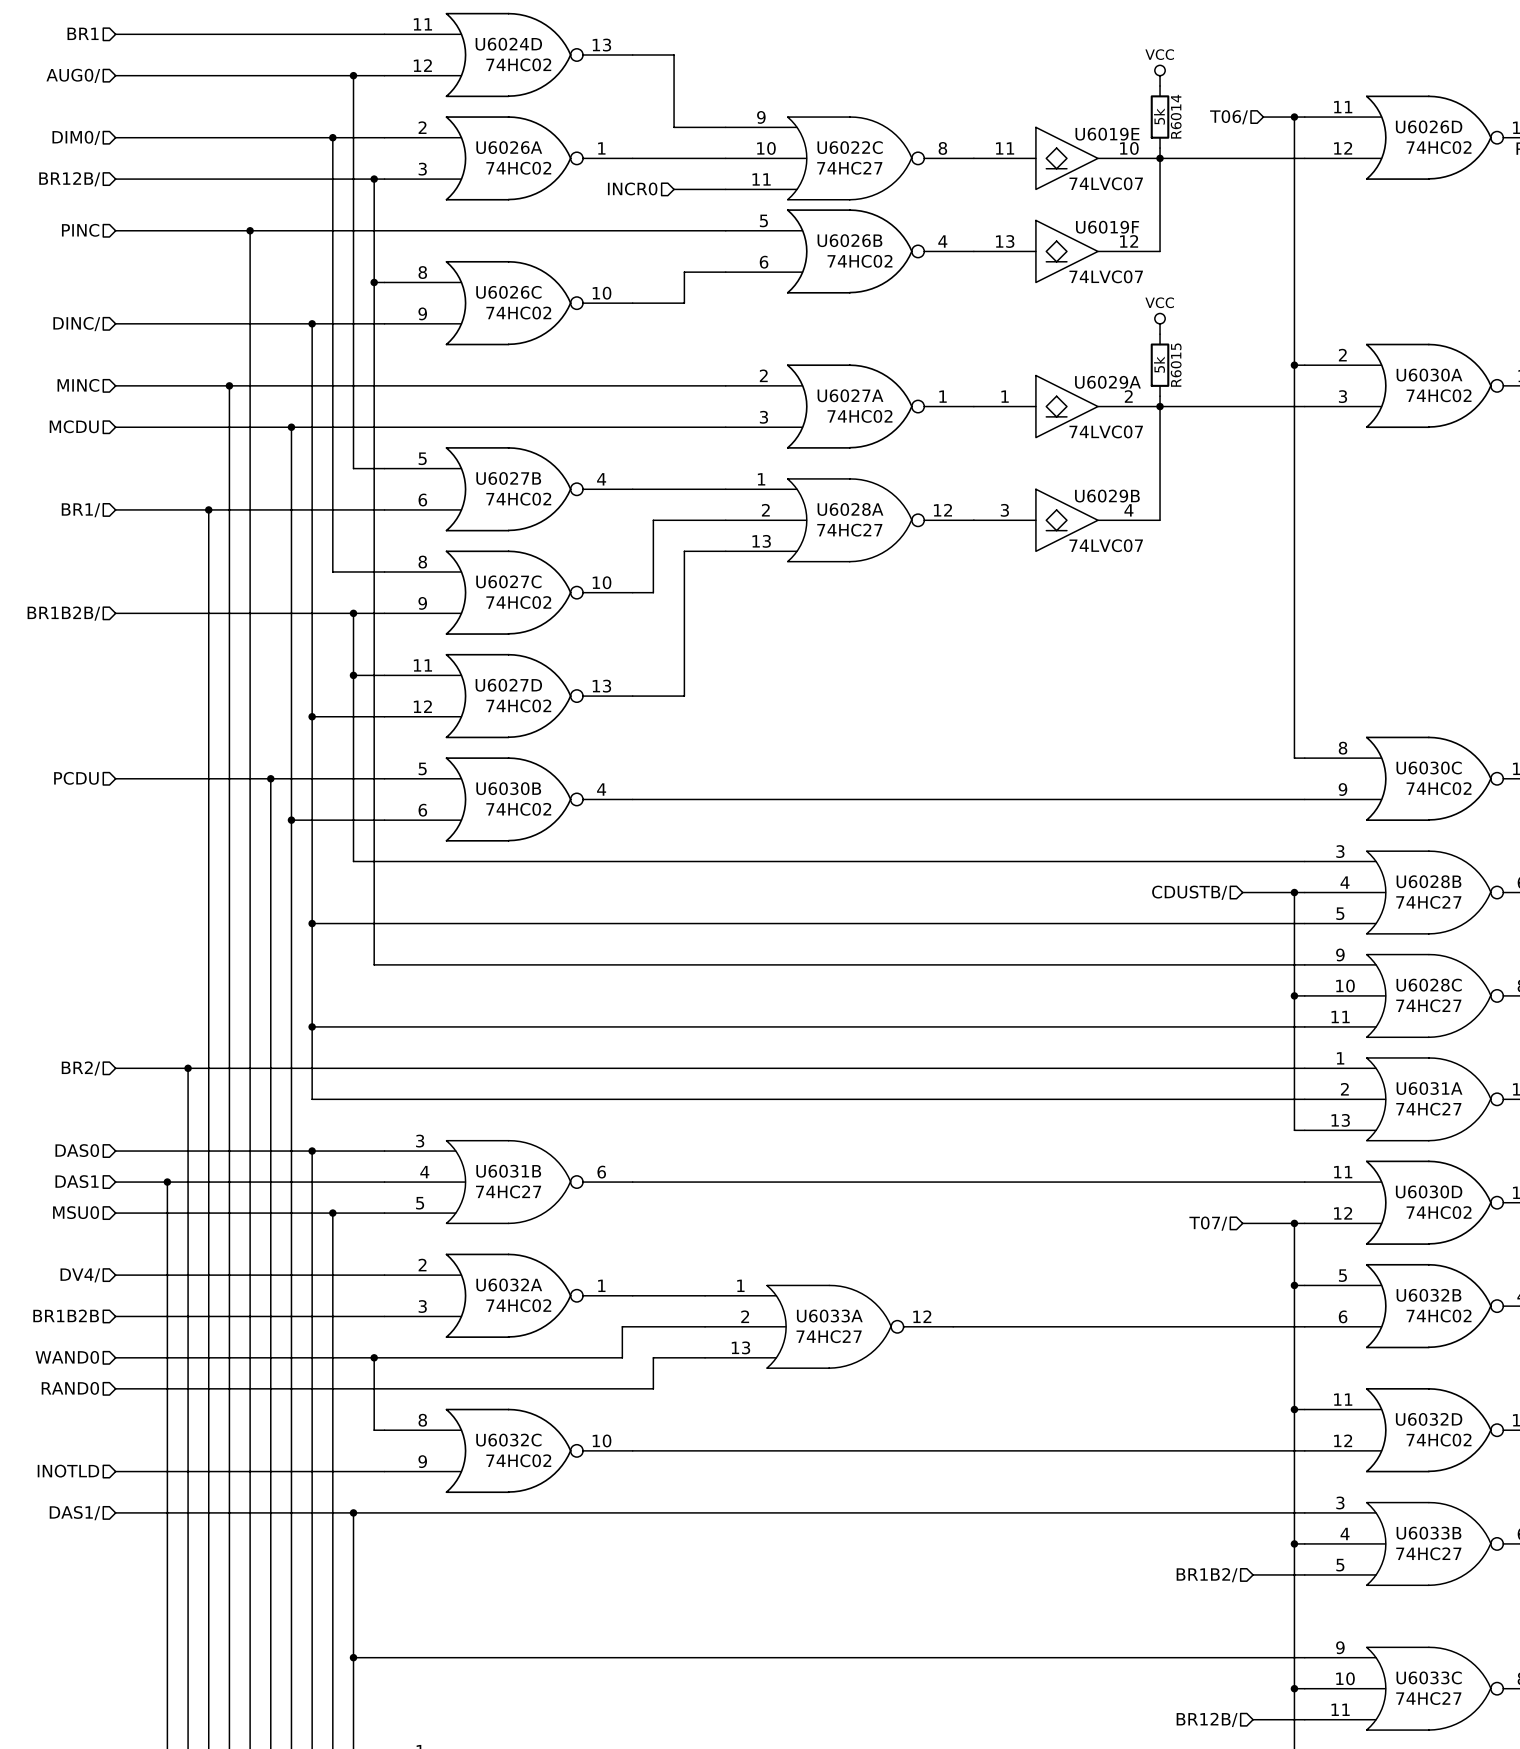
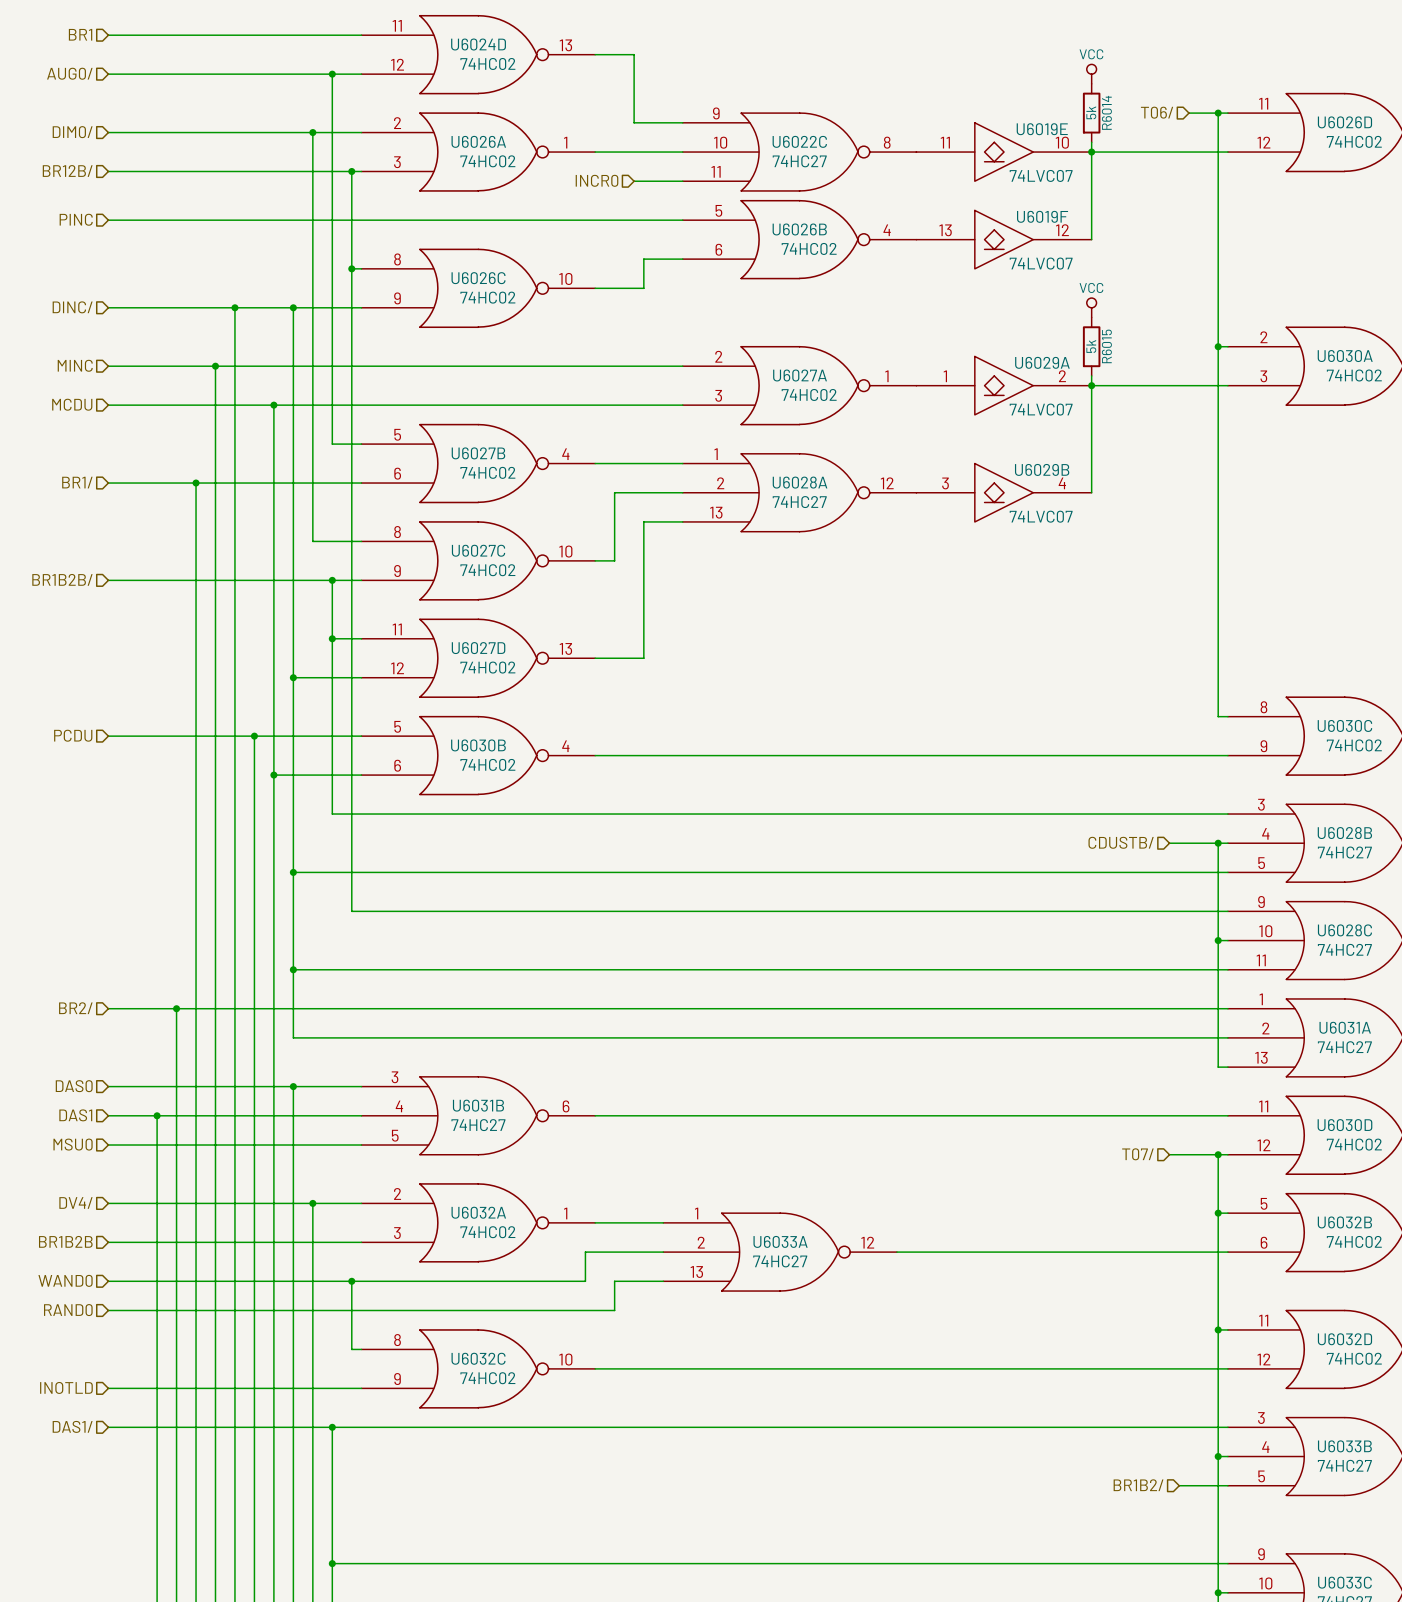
wire: (250, 230) (250, 323) -> none
junction: (250, 230) -> none
junction: none -> (234, 307)
wire: (332, 1213) (332, 1275) -> none
junction: (332, 1213) -> none
junction: none -> (312, 1203)

